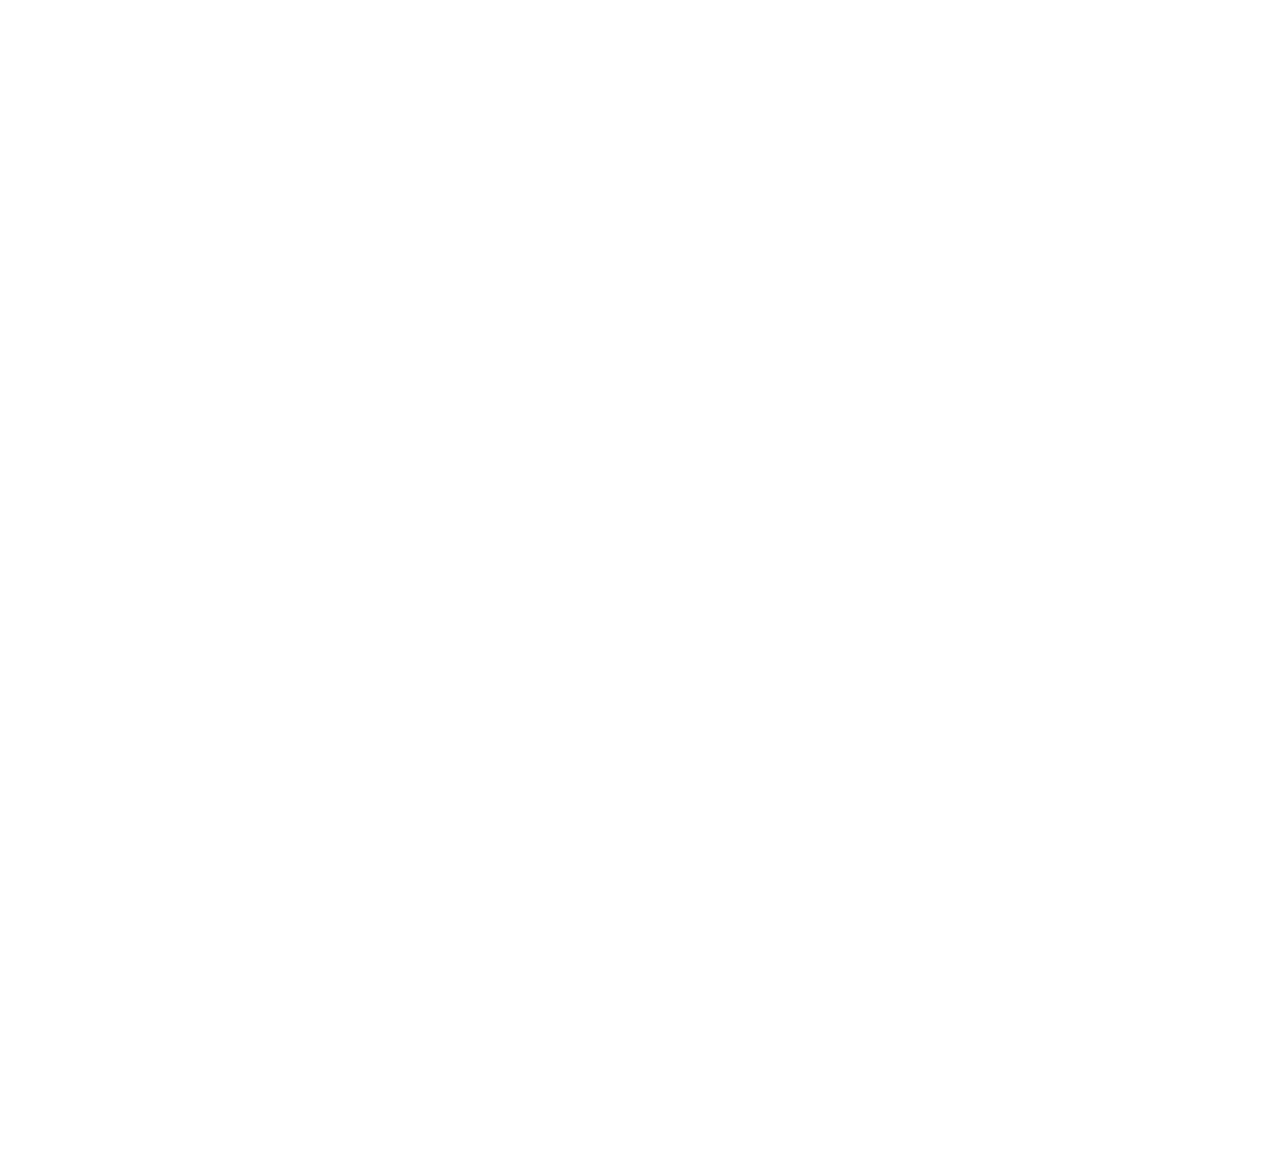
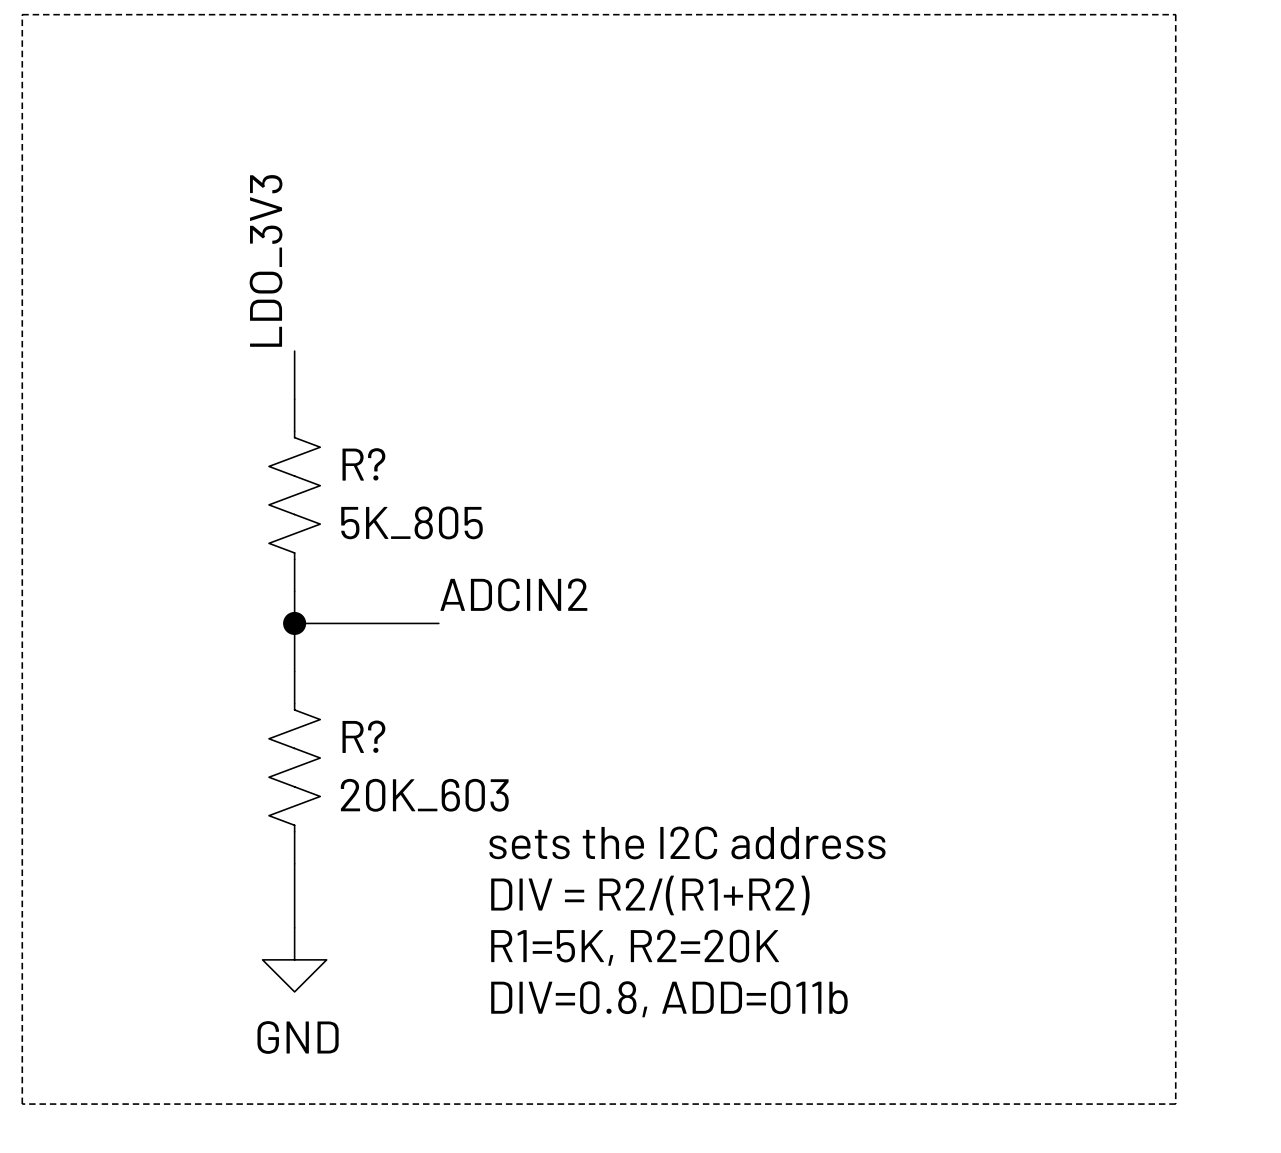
line: none -> (22, 14) (1175, 14) (1175, 1104) (22, 1104) (22, 14)
label: none -> LDO_3V3 (266, 260)
wire: none -> (294, 351) (294, 399)
R?: none -> 5K_805 (294, 495)
wire: none -> (294, 591) (294, 671)
label: none -> ADCIN2 (513, 594)
wire: none -> (294, 623) (438, 623)
junction: none -> (294, 623)
R?: none -> 20K_603 (294, 767)
text: none -> sets the I2C address (687, 842)
wire: none -> (294, 863) (294, 927)
text: none -> DIV = R2/(R1+R2) (650, 895)
text: none -> R1=5K, R2=20K (635, 947)
power symbol: none -> GND (294, 959)
text: none -> DIV=0.8, ADD=011b (669, 999)

